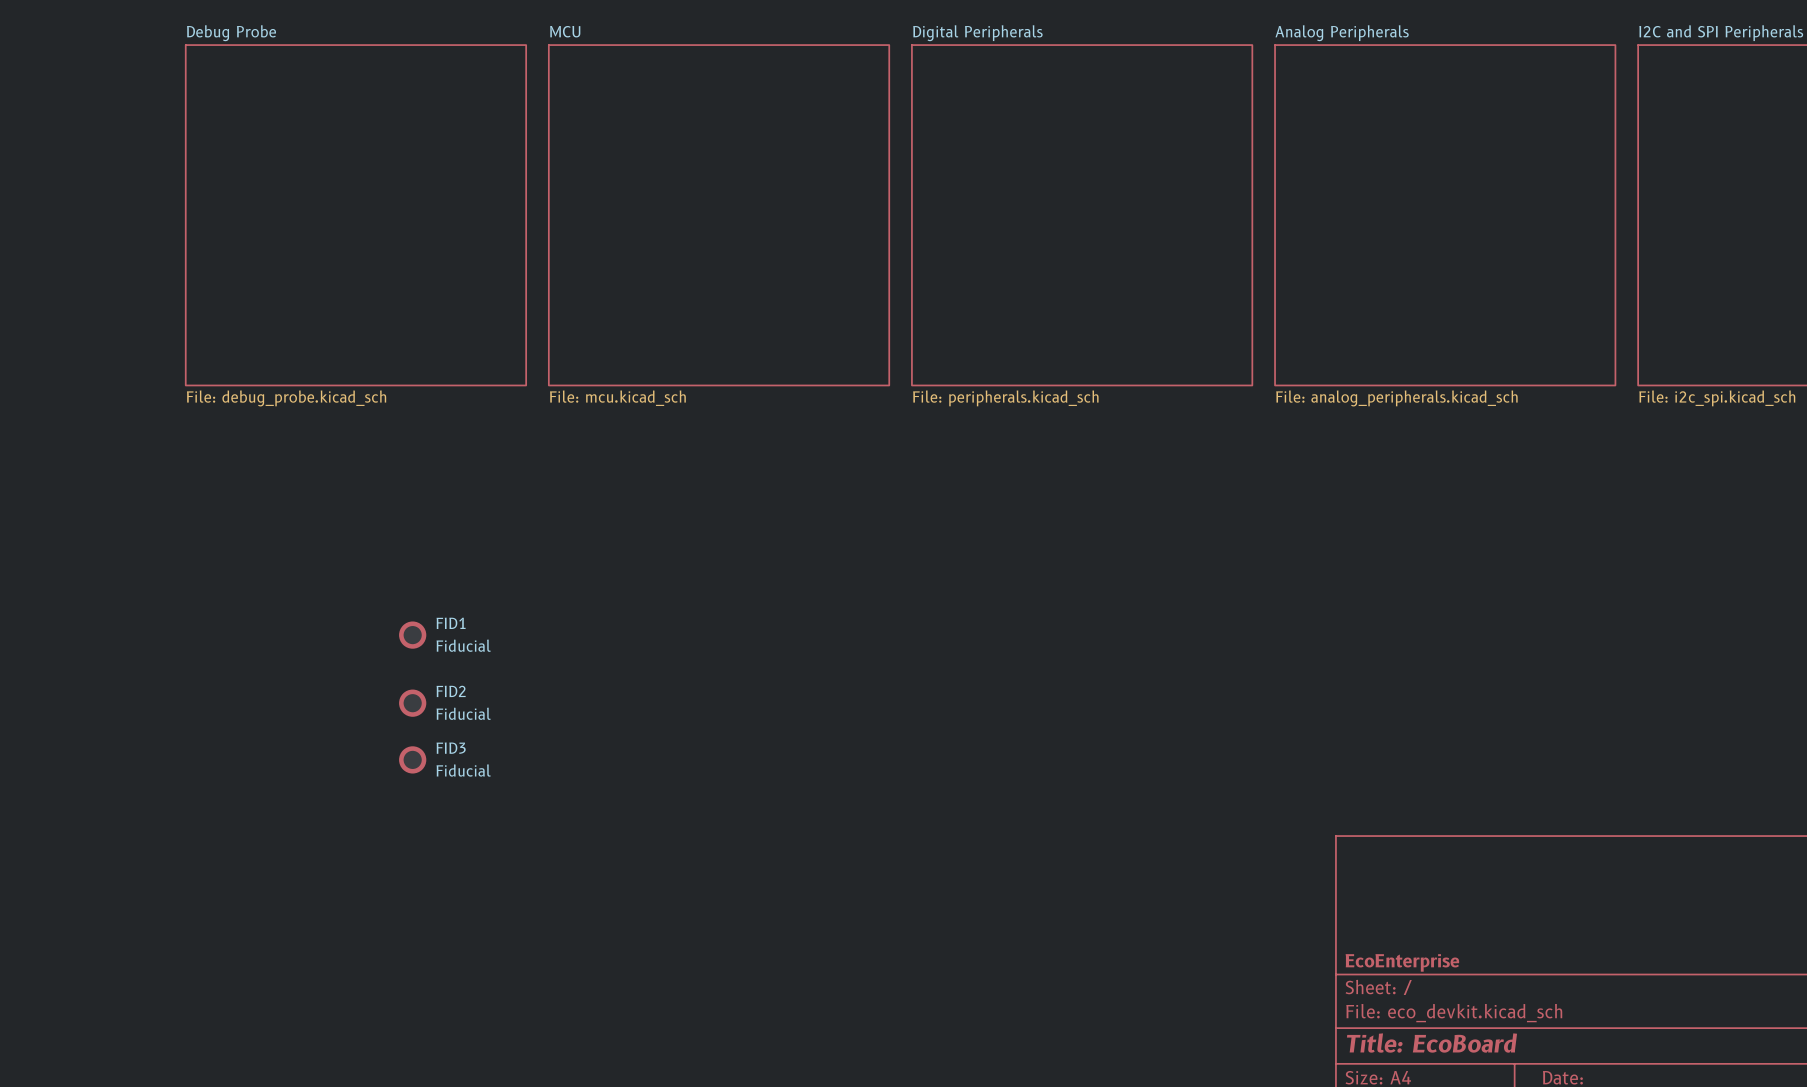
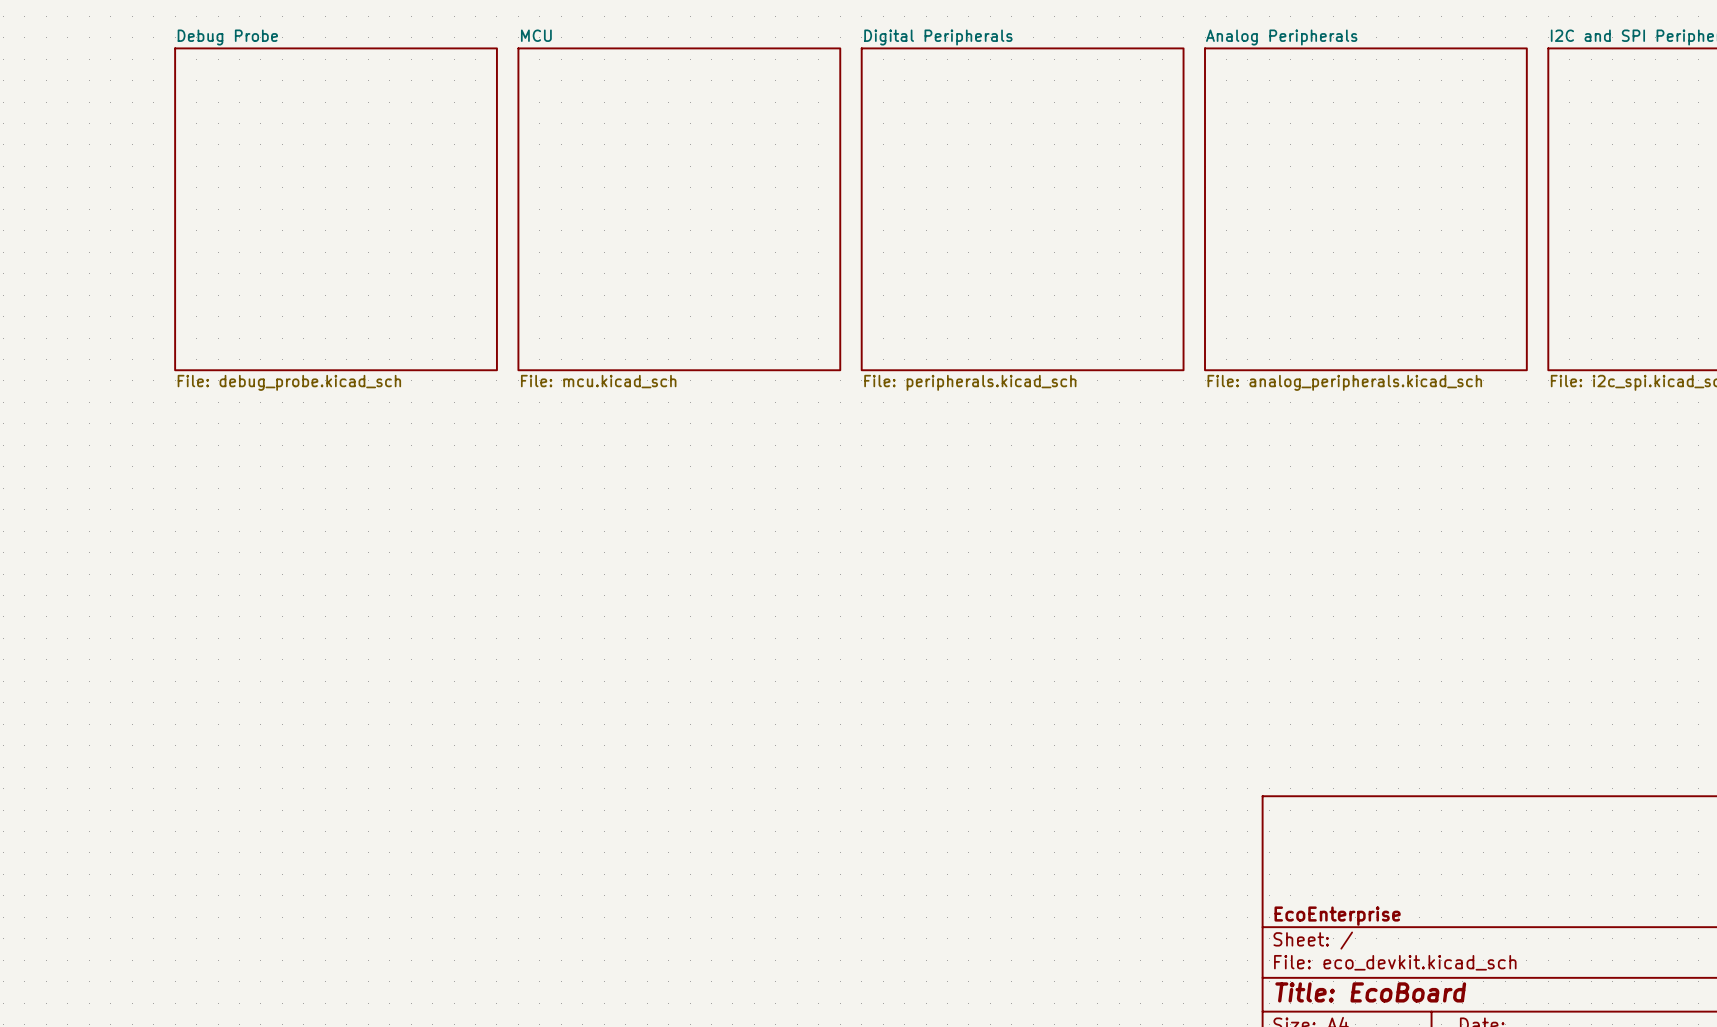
FID1: Fiducial (412, 635) -> none
FID2: Fiducial (412, 703) -> none
FID3: Fiducial (412, 759) -> none

